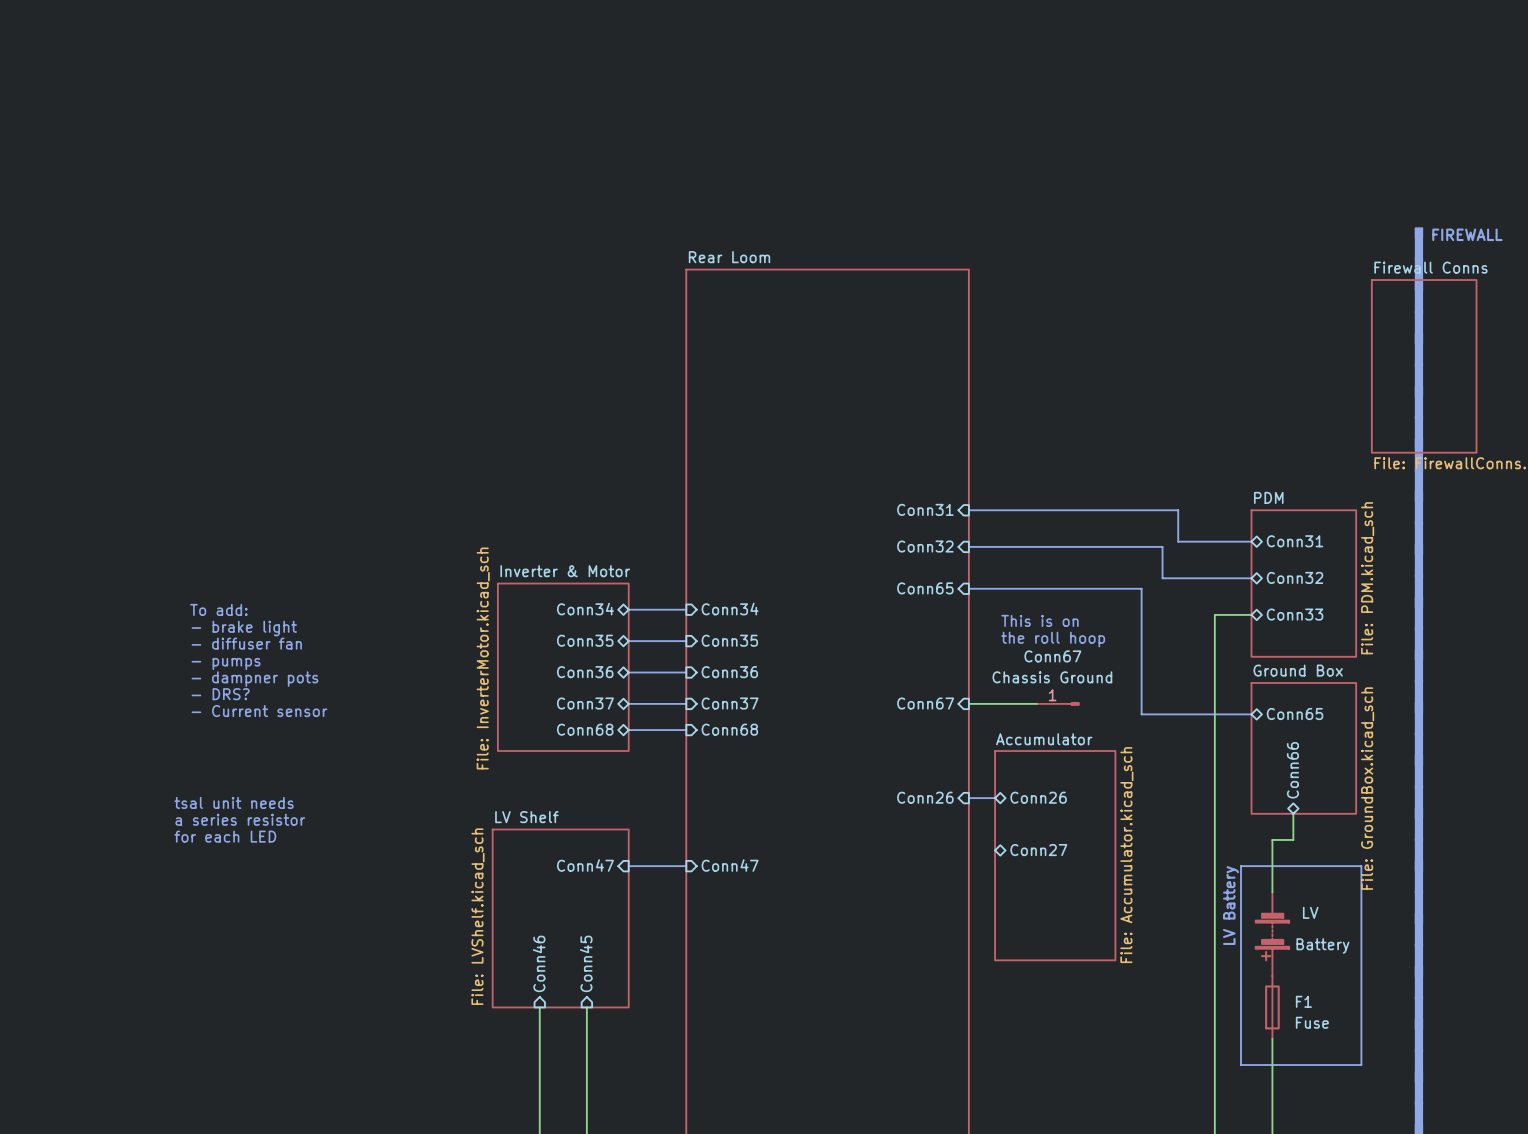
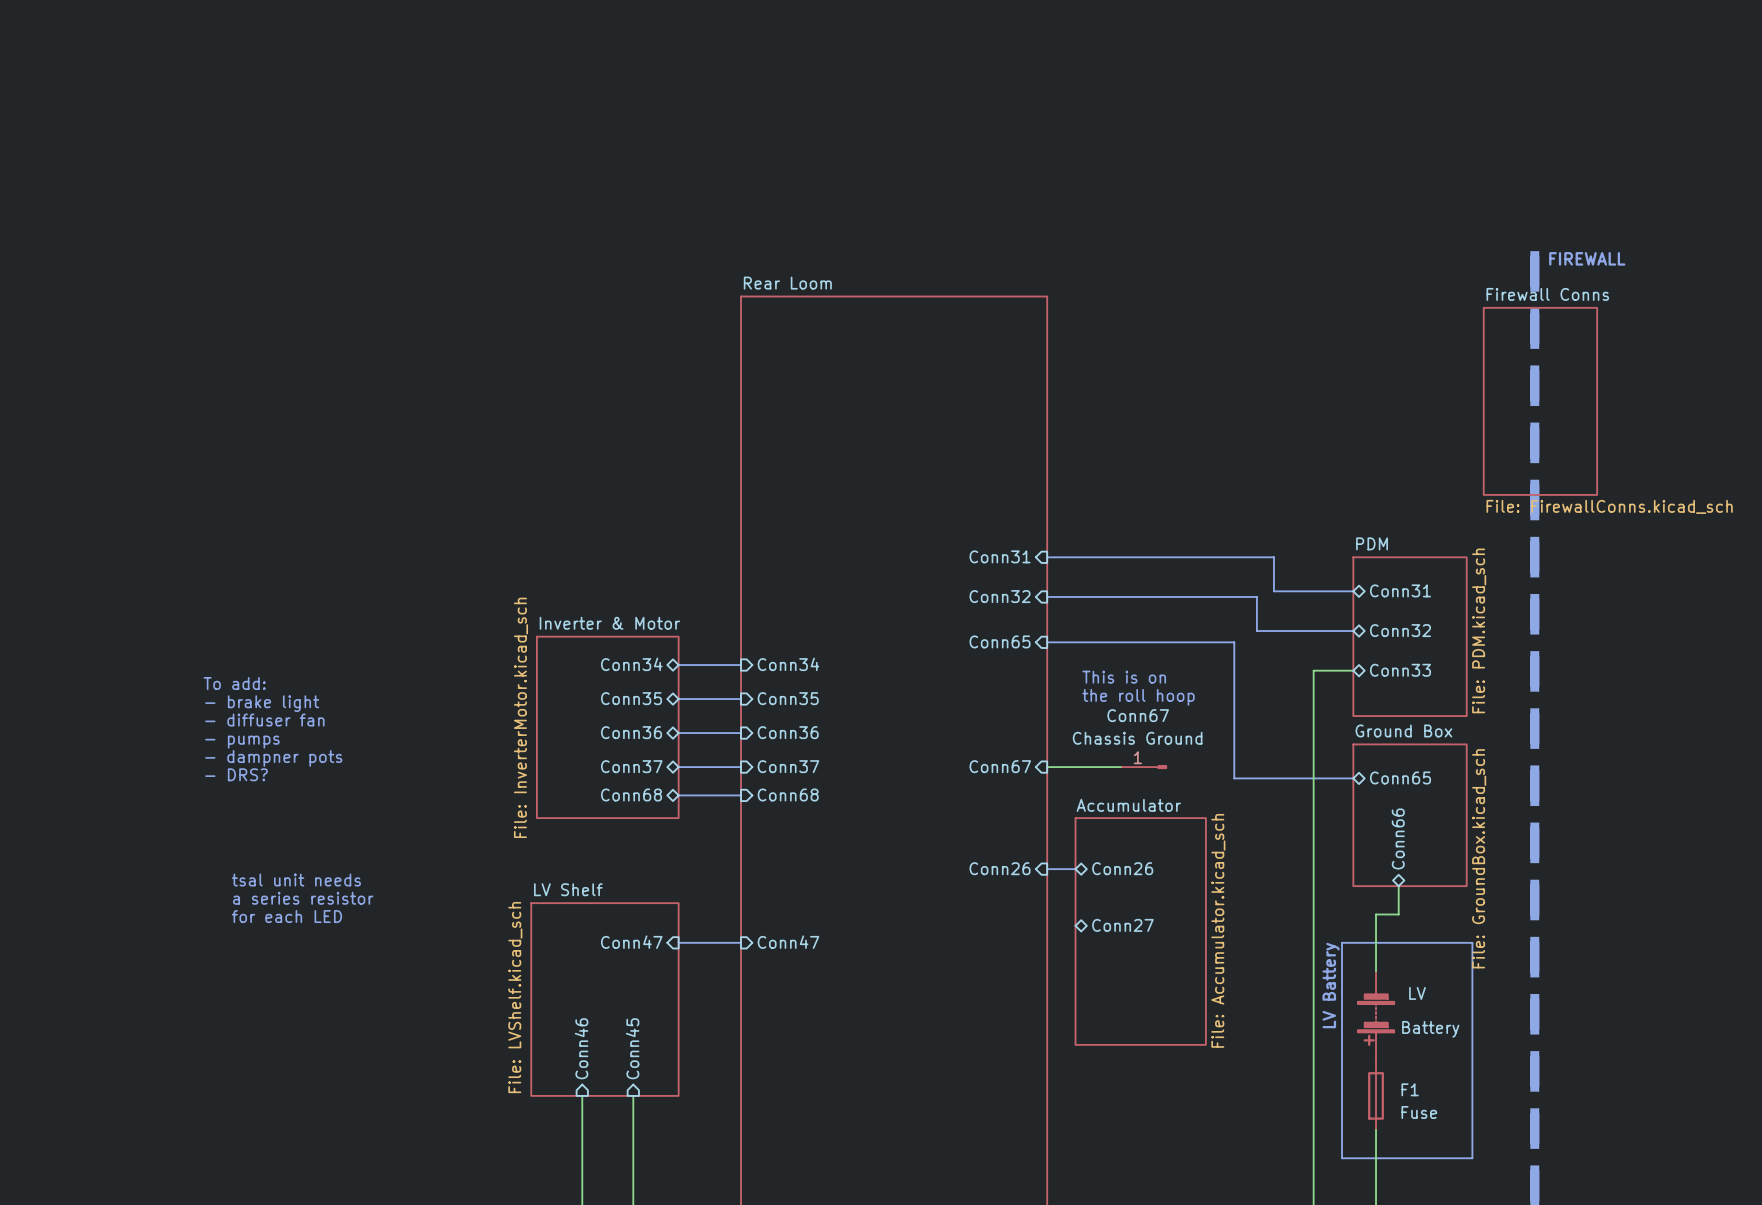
text: To add: (218, 609) -> none
text: - brake light (244, 628) -> To add: (234, 683)
text: - diffuser fan (246, 643) -> - brake light (262, 703)
text: - pumps (226, 663) -> - diffuser fan (264, 720)
text: - dampner pots (255, 679) -> - pumps (242, 742)
text: - DRS? (220, 694) -> - dampner pots (273, 758)
text: - Current sensor (259, 711) -> - DRS? (236, 774)
text position: tsal unit needs (234, 802) -> tsal unit needs (296, 880)
text position: a series resistor (240, 819) -> a series resistor (303, 898)
text position: for each LED (225, 836) -> for each LED (287, 916)

